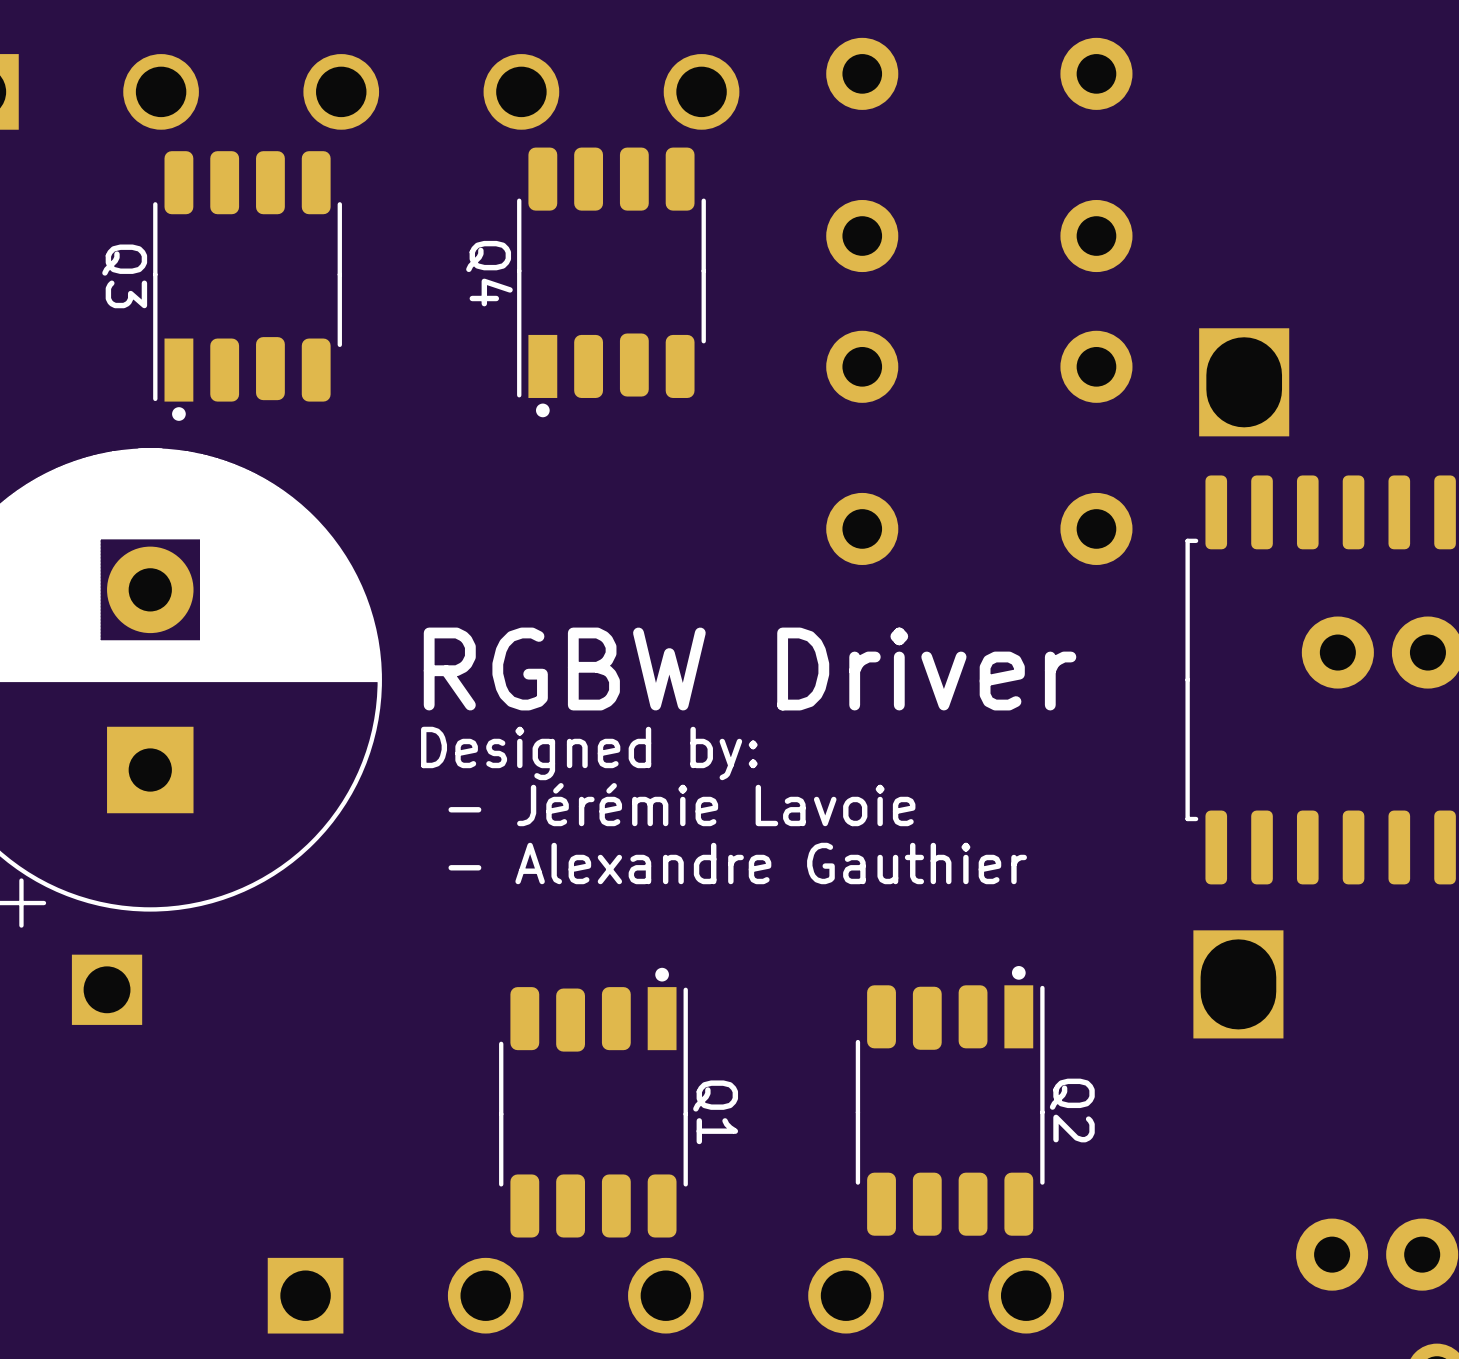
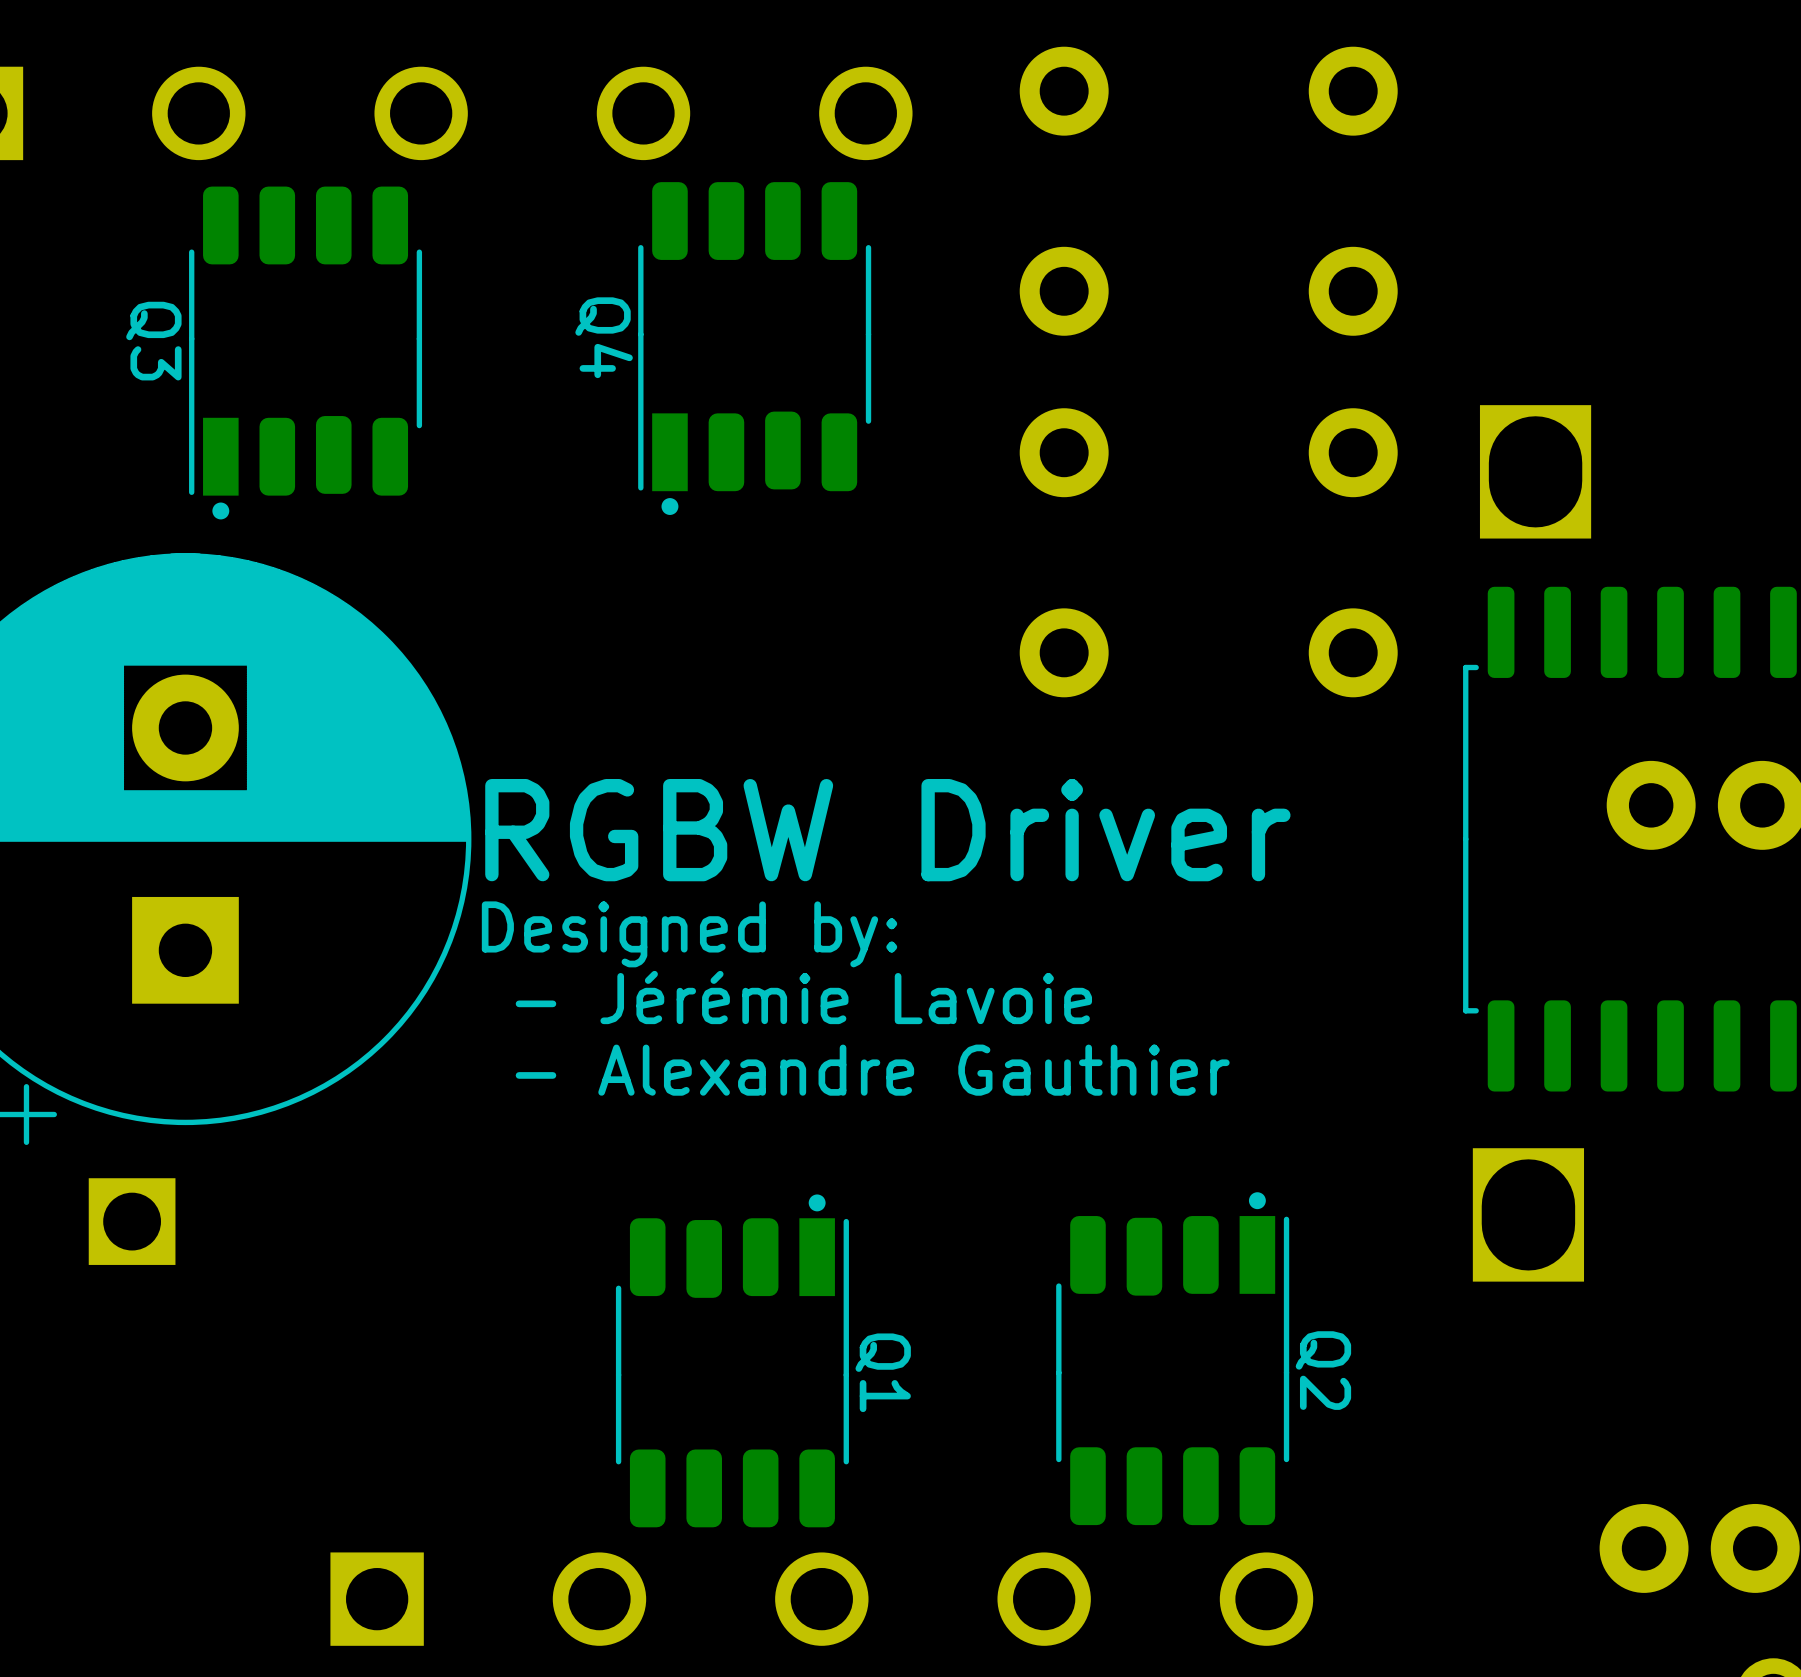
text position: RGBW Driver (750, 669) -> RGBW Driver (887, 830)
text position: Designed by: (589, 753) -> Designed by: (689, 934)
text position: - Jérémie Lavoie (681, 804) -> - Jérémie Lavoie (803, 997)
text position: - Alexandre Gauthier (737, 863) -> - Alexandre Gauthier (872, 1070)

